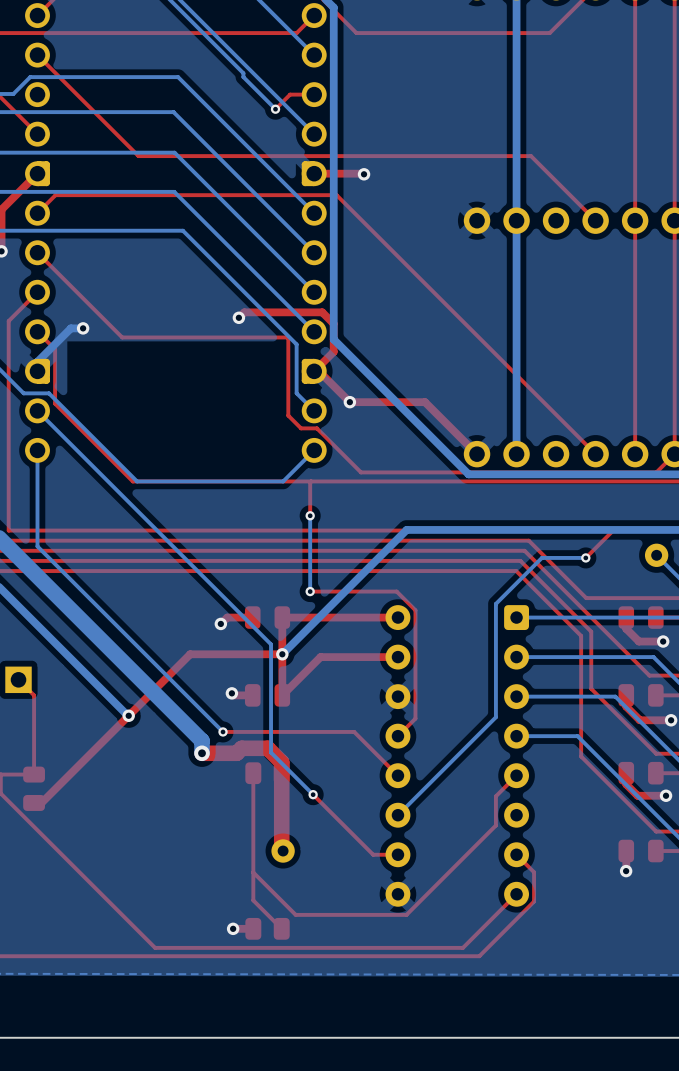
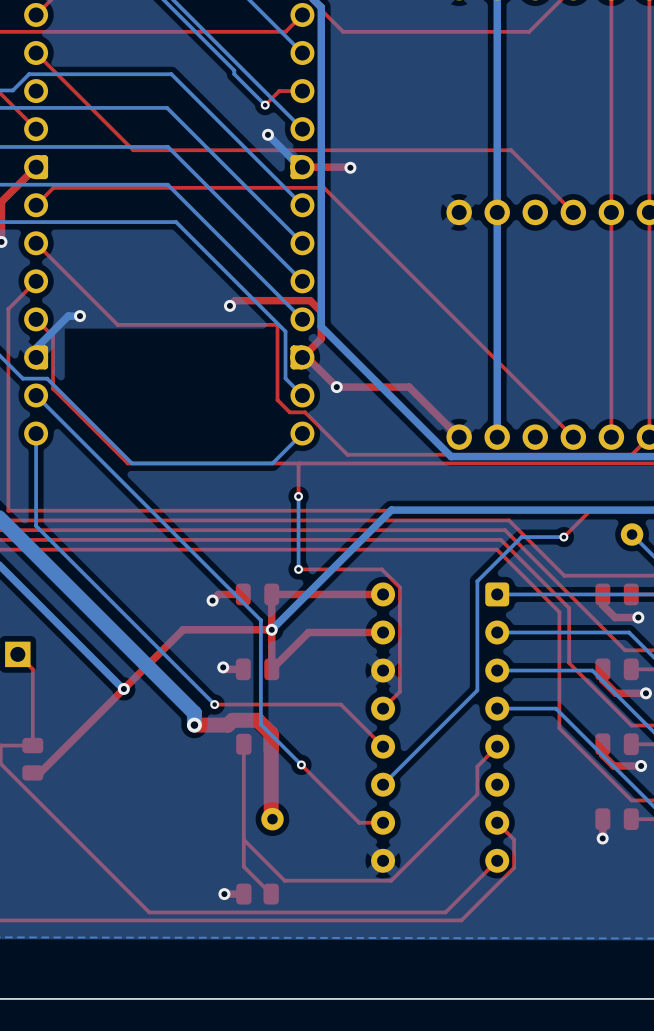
bottom track: none -> (268, 134) (302, 167)
via: none -> (268, 134)

